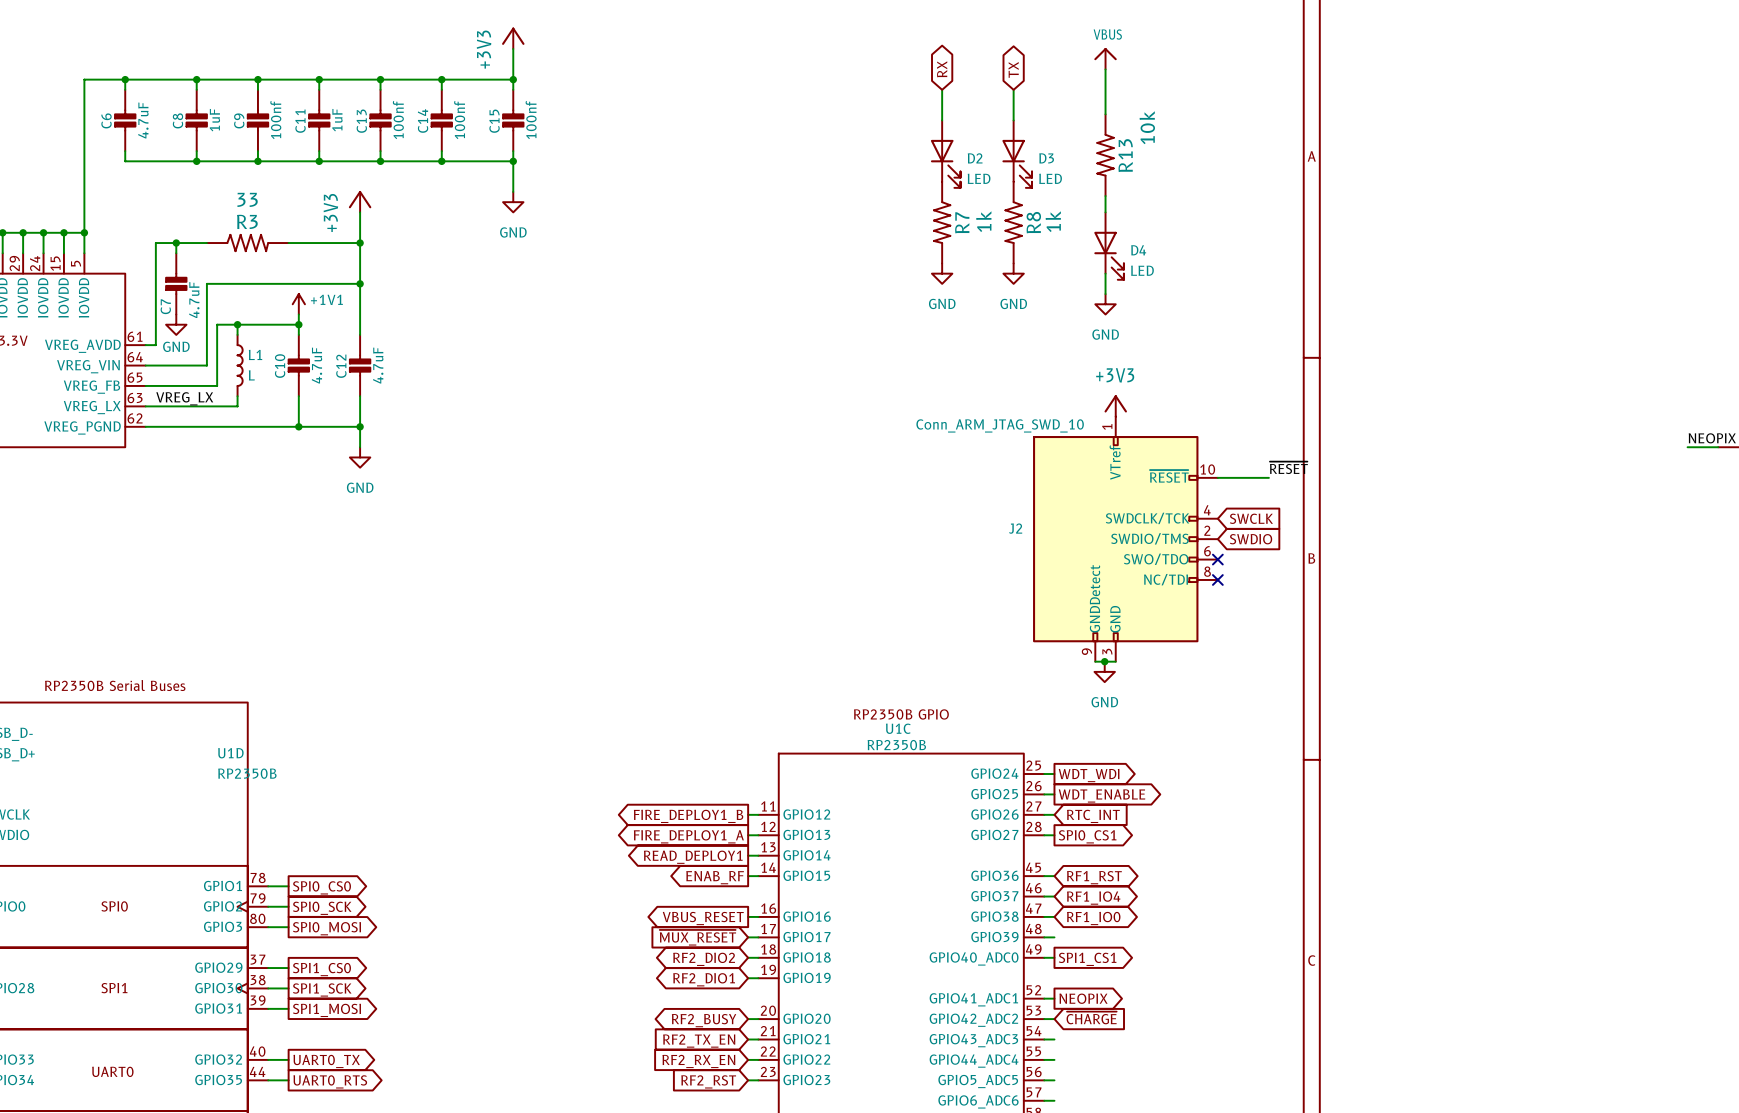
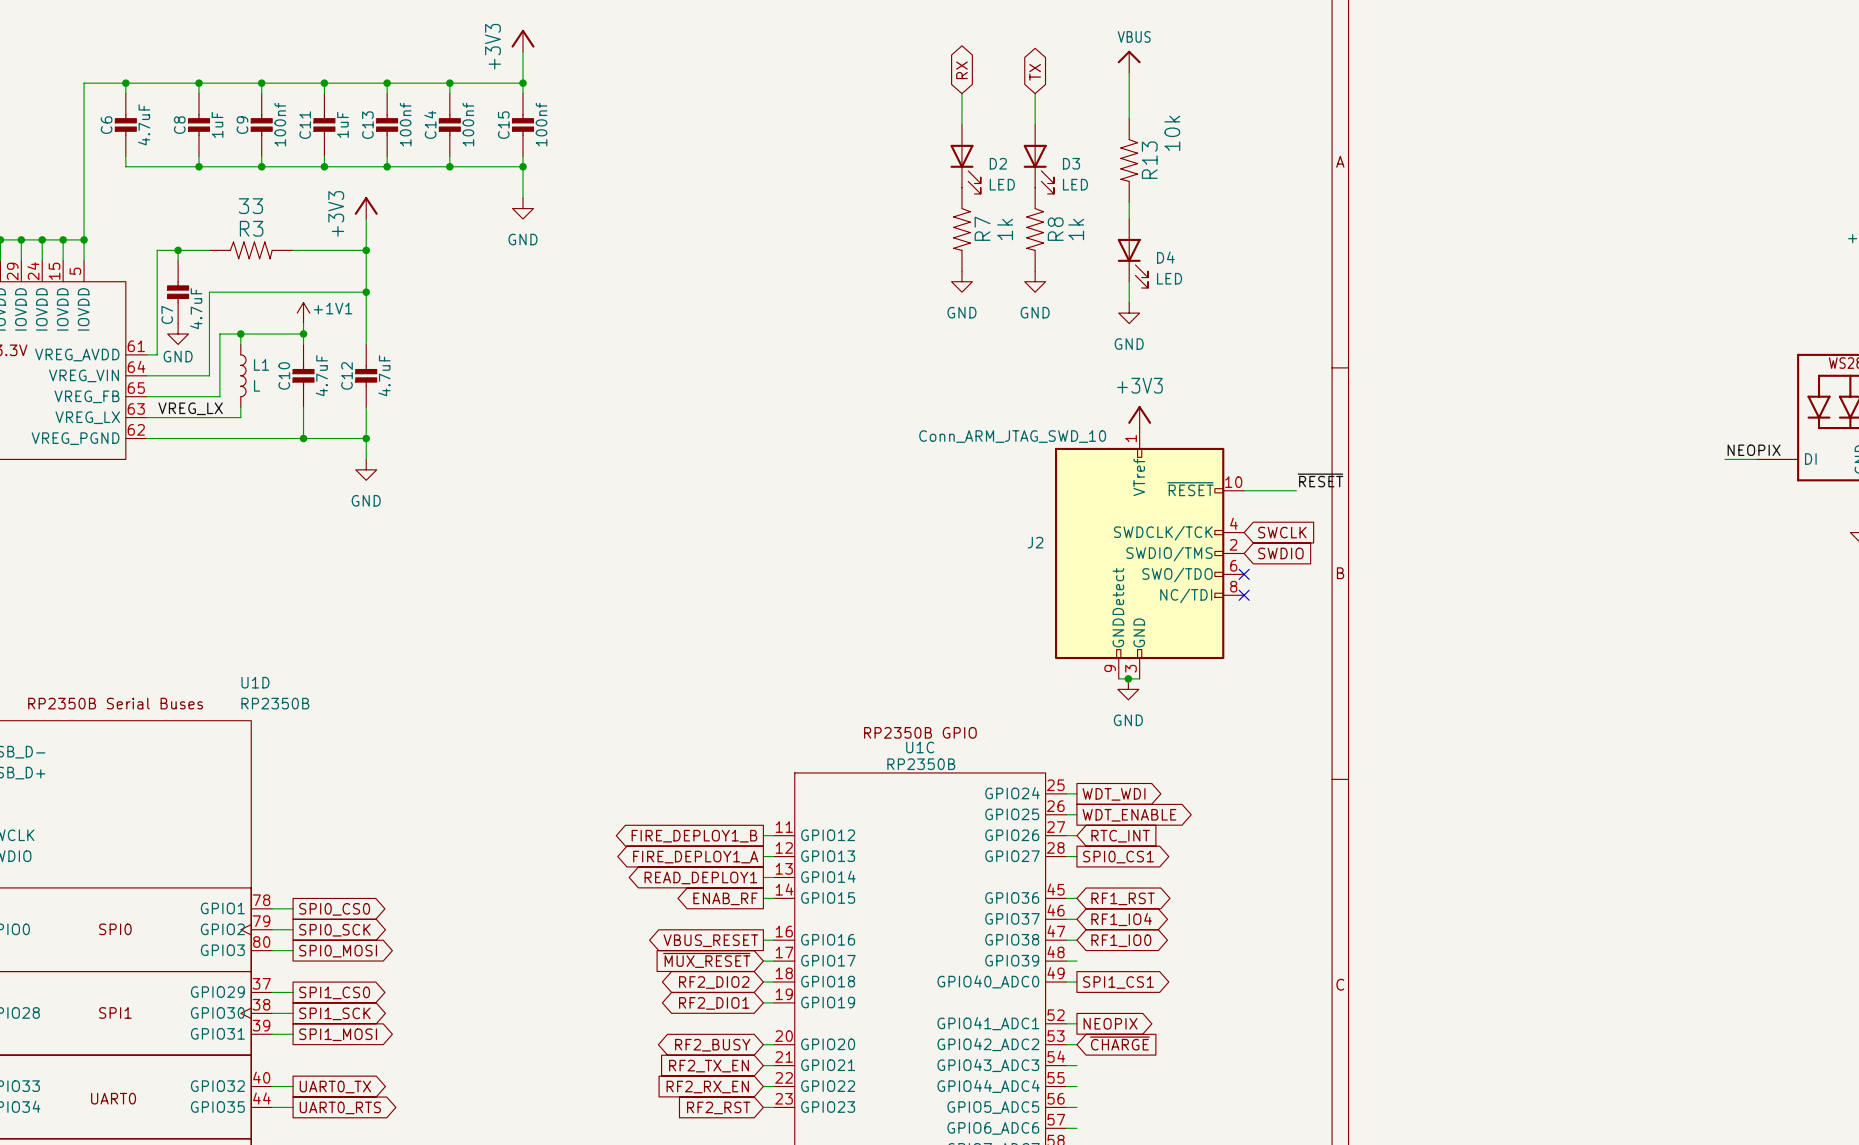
U1D name position: U1D (230, 753) -> U1D (255, 682)
U1D value position: RP2350B (247, 773) -> RP2350B (275, 703)

